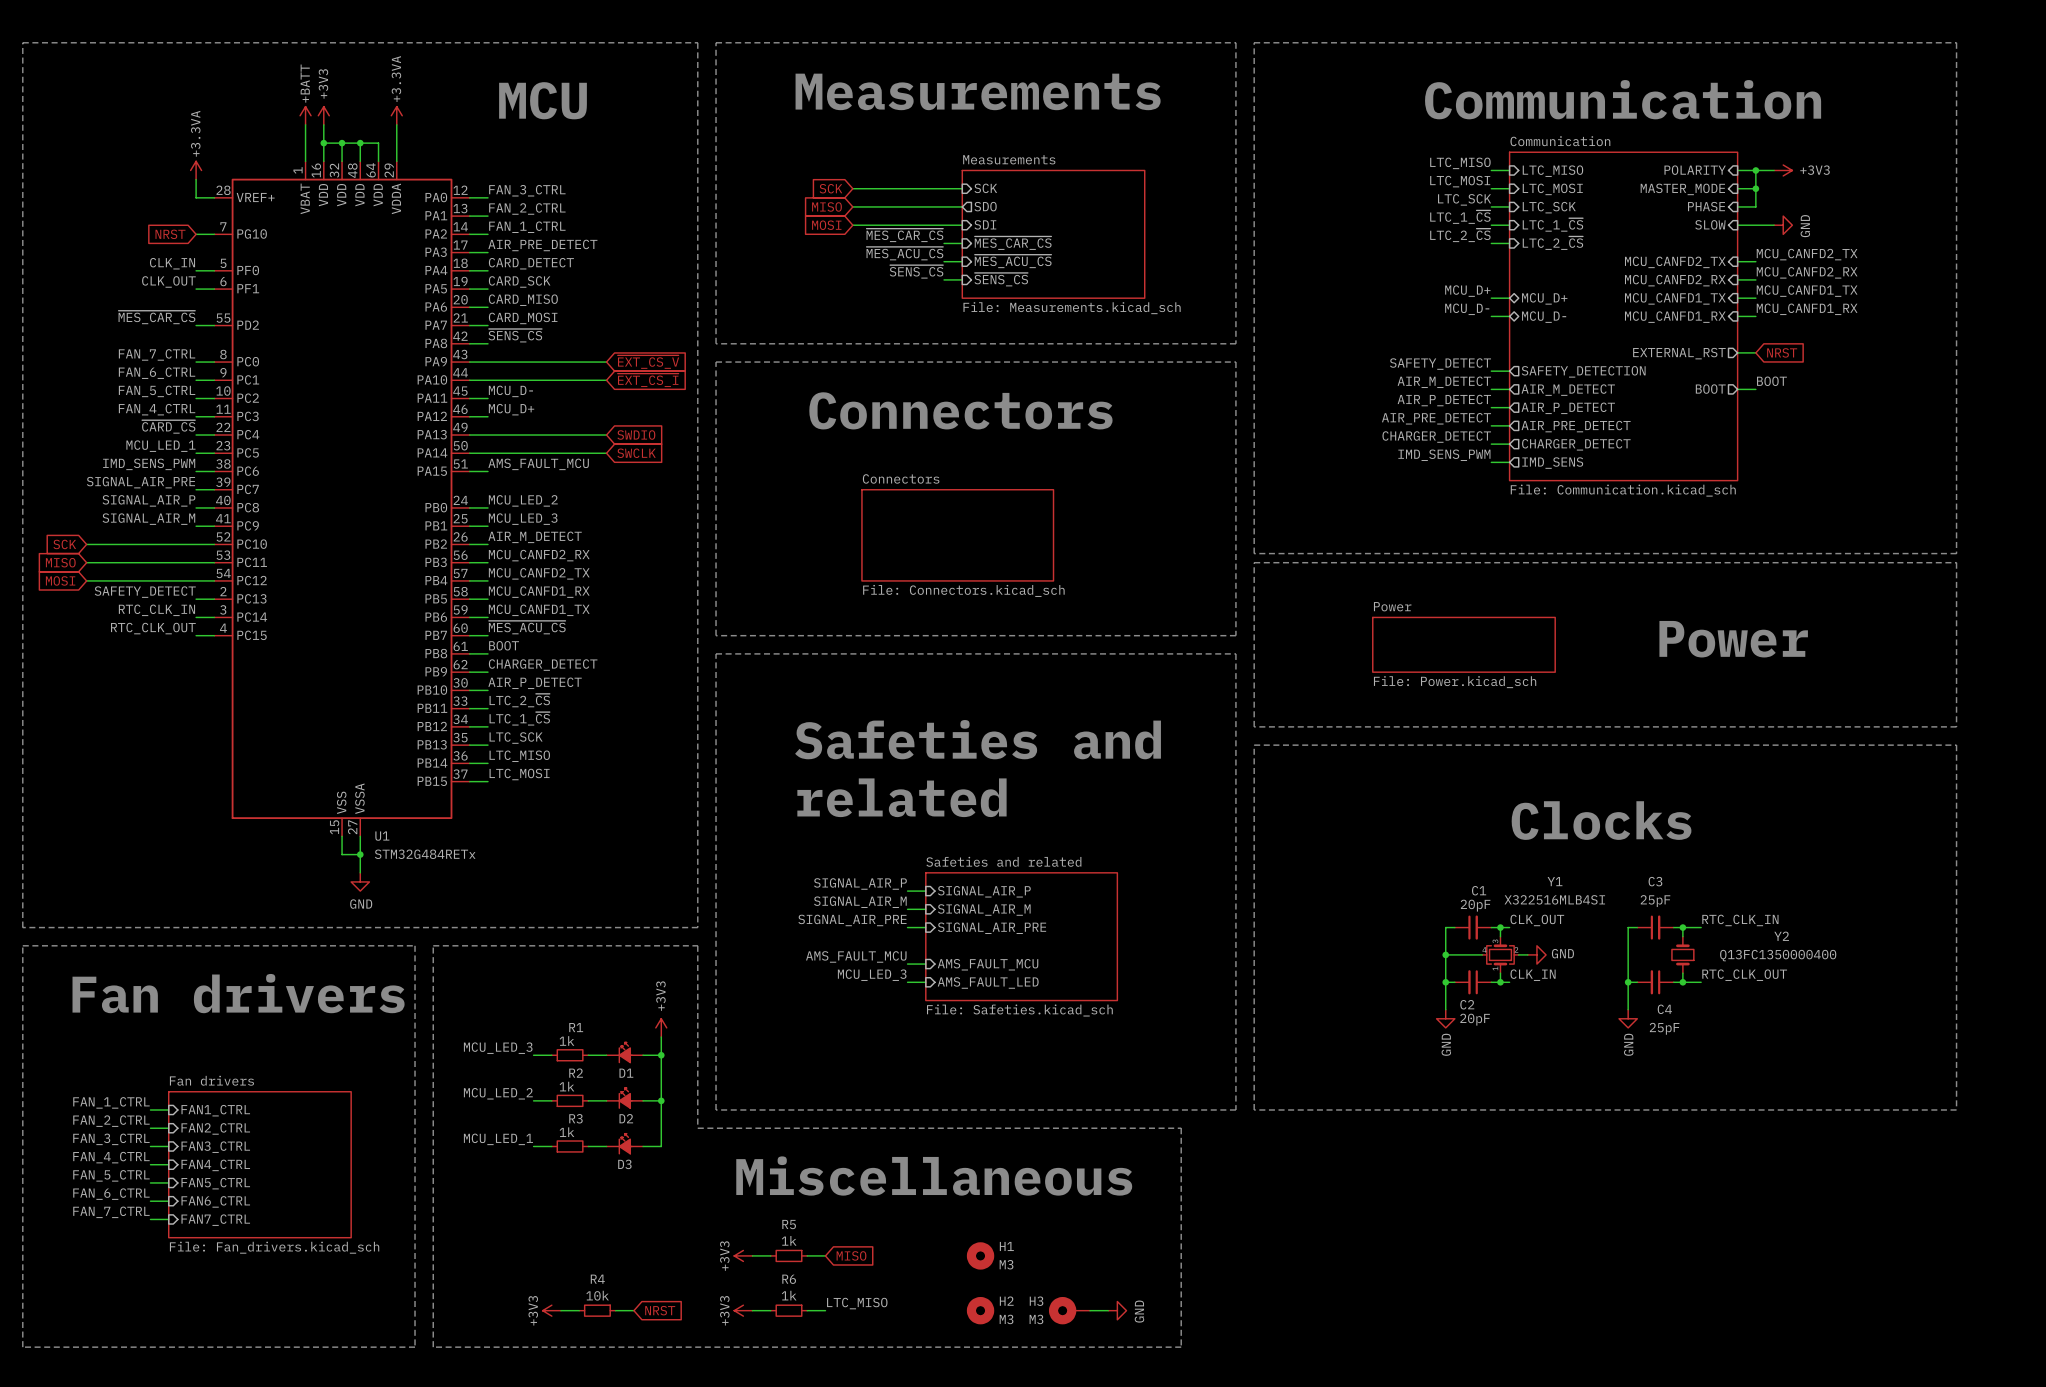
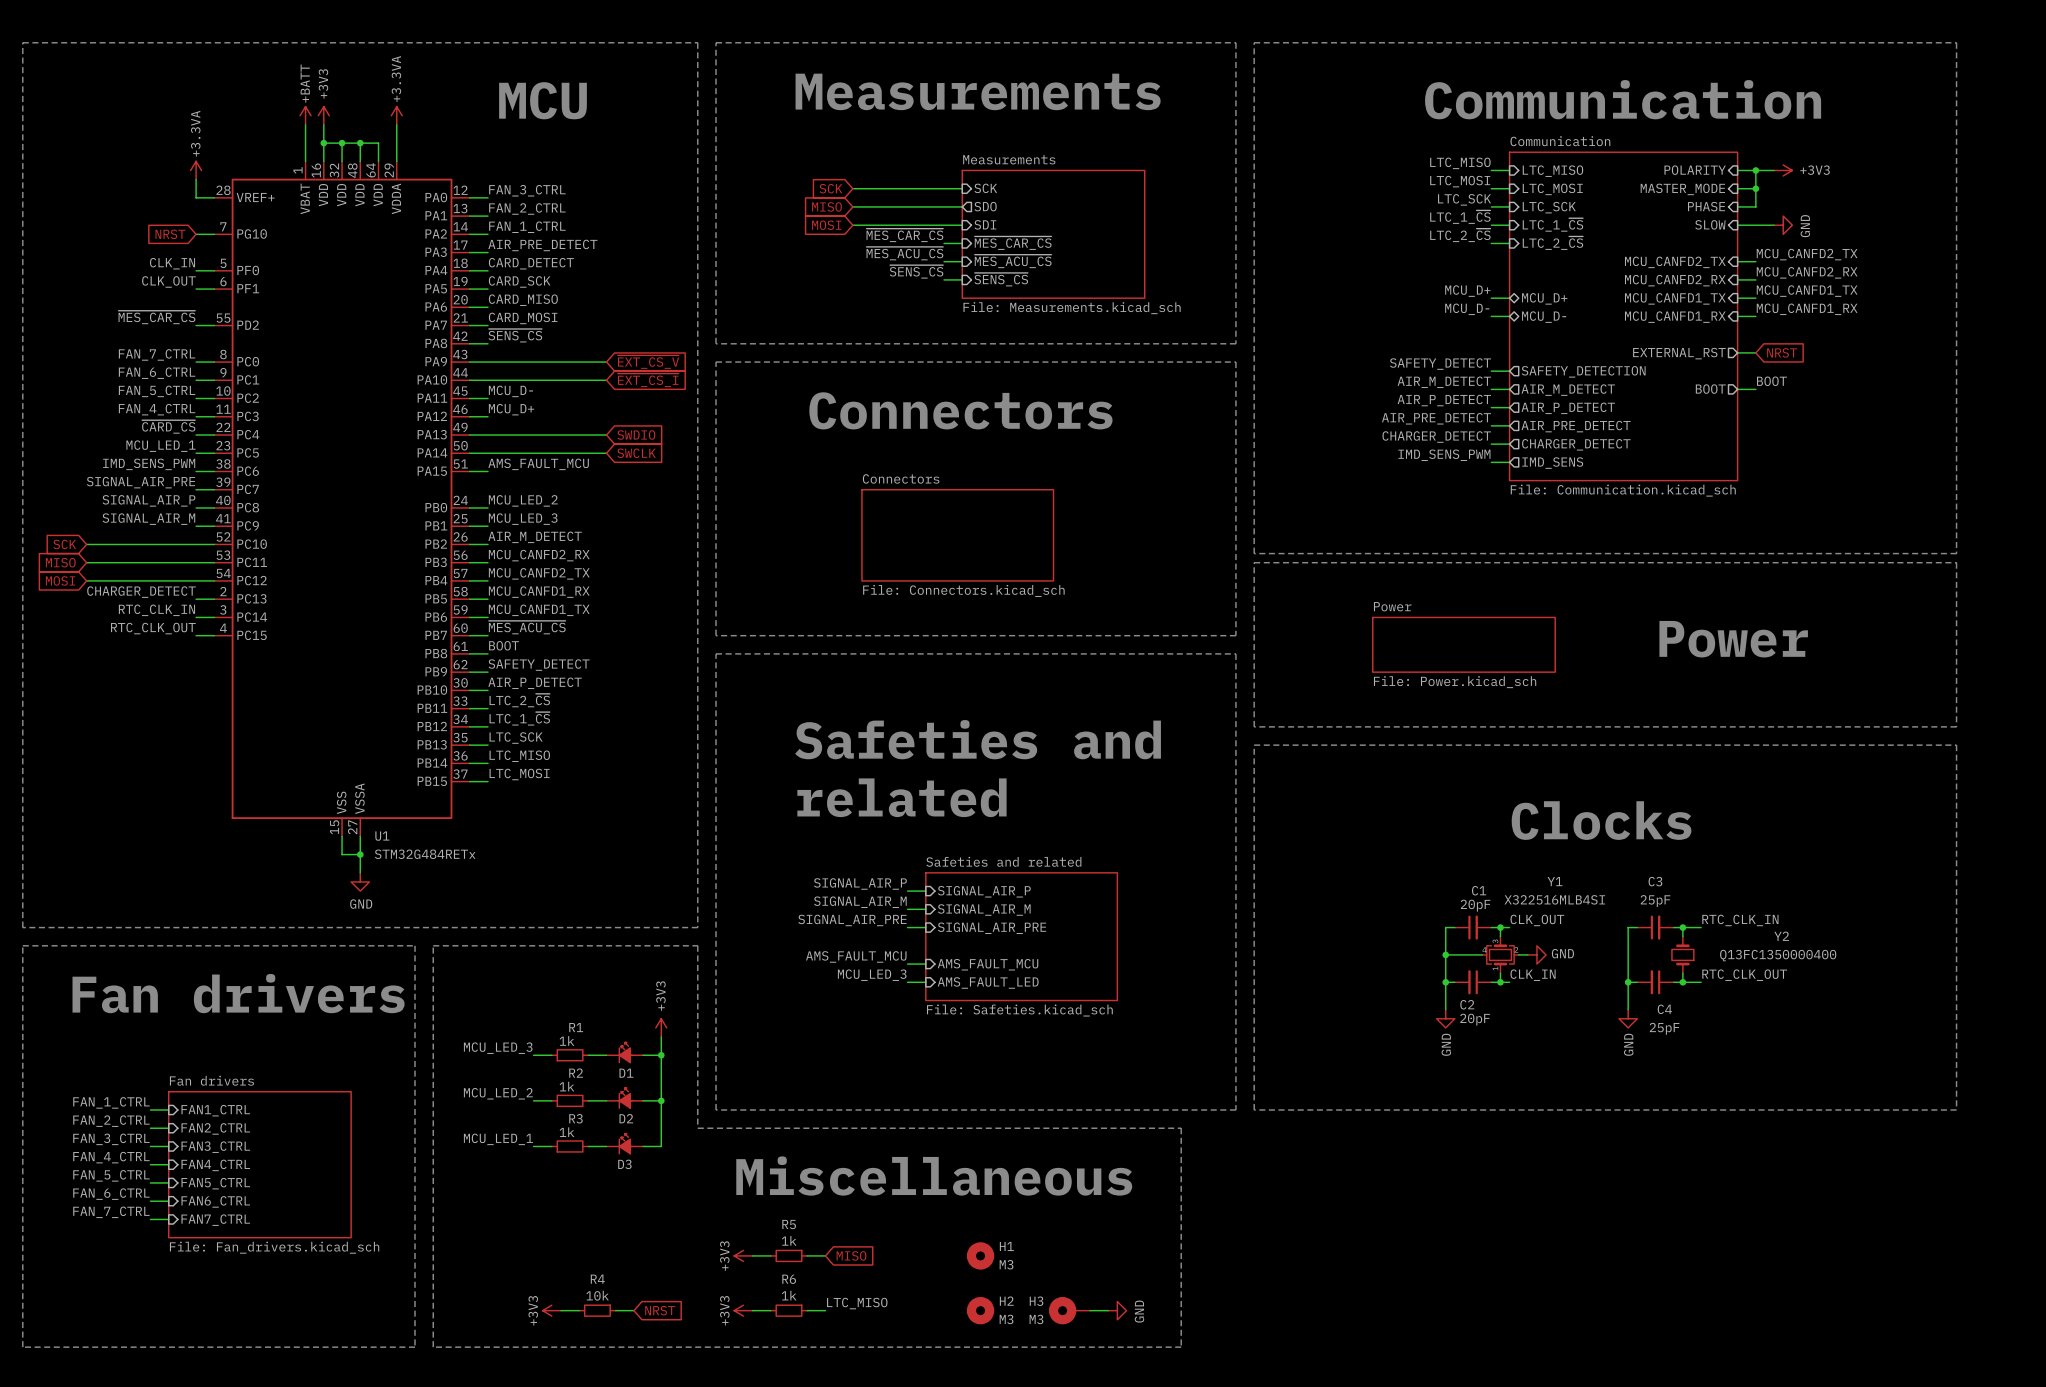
label: SAFETY_DETECT (145, 592) -> CHARGER_DETECT (141, 592)
label: CHARGER_DETECT (543, 665) -> SAFETY_DETECT (539, 665)

